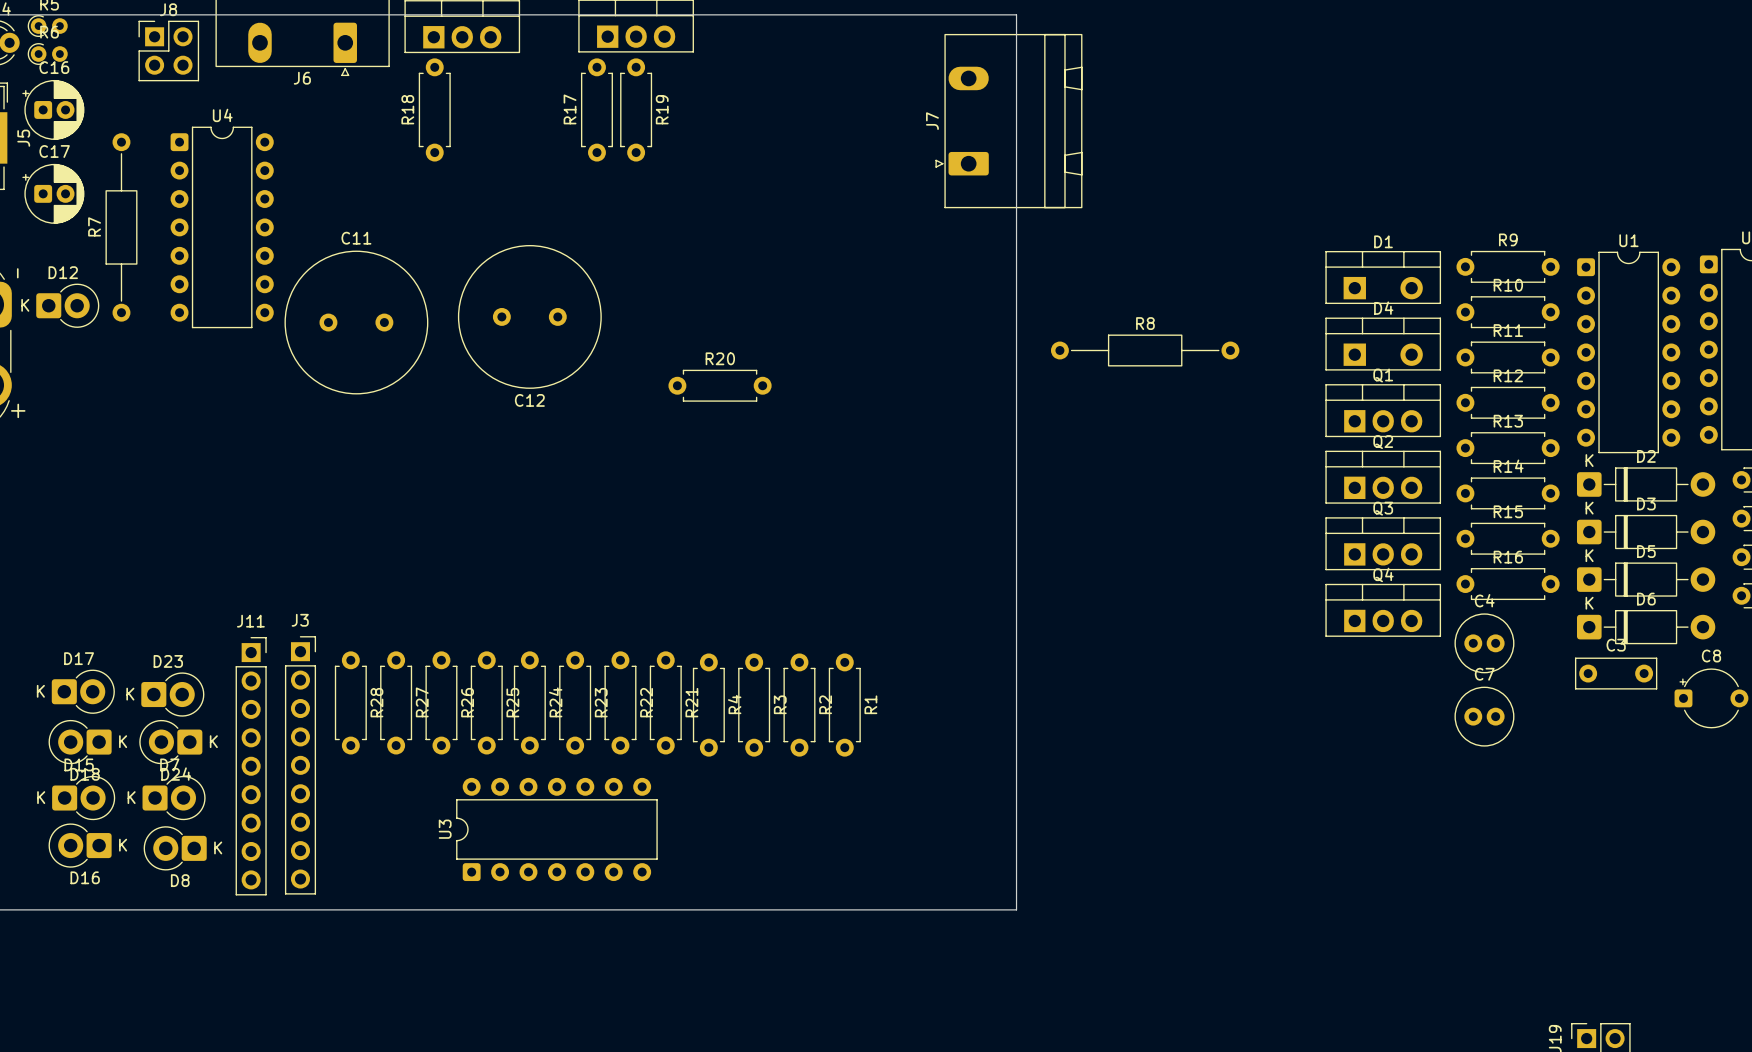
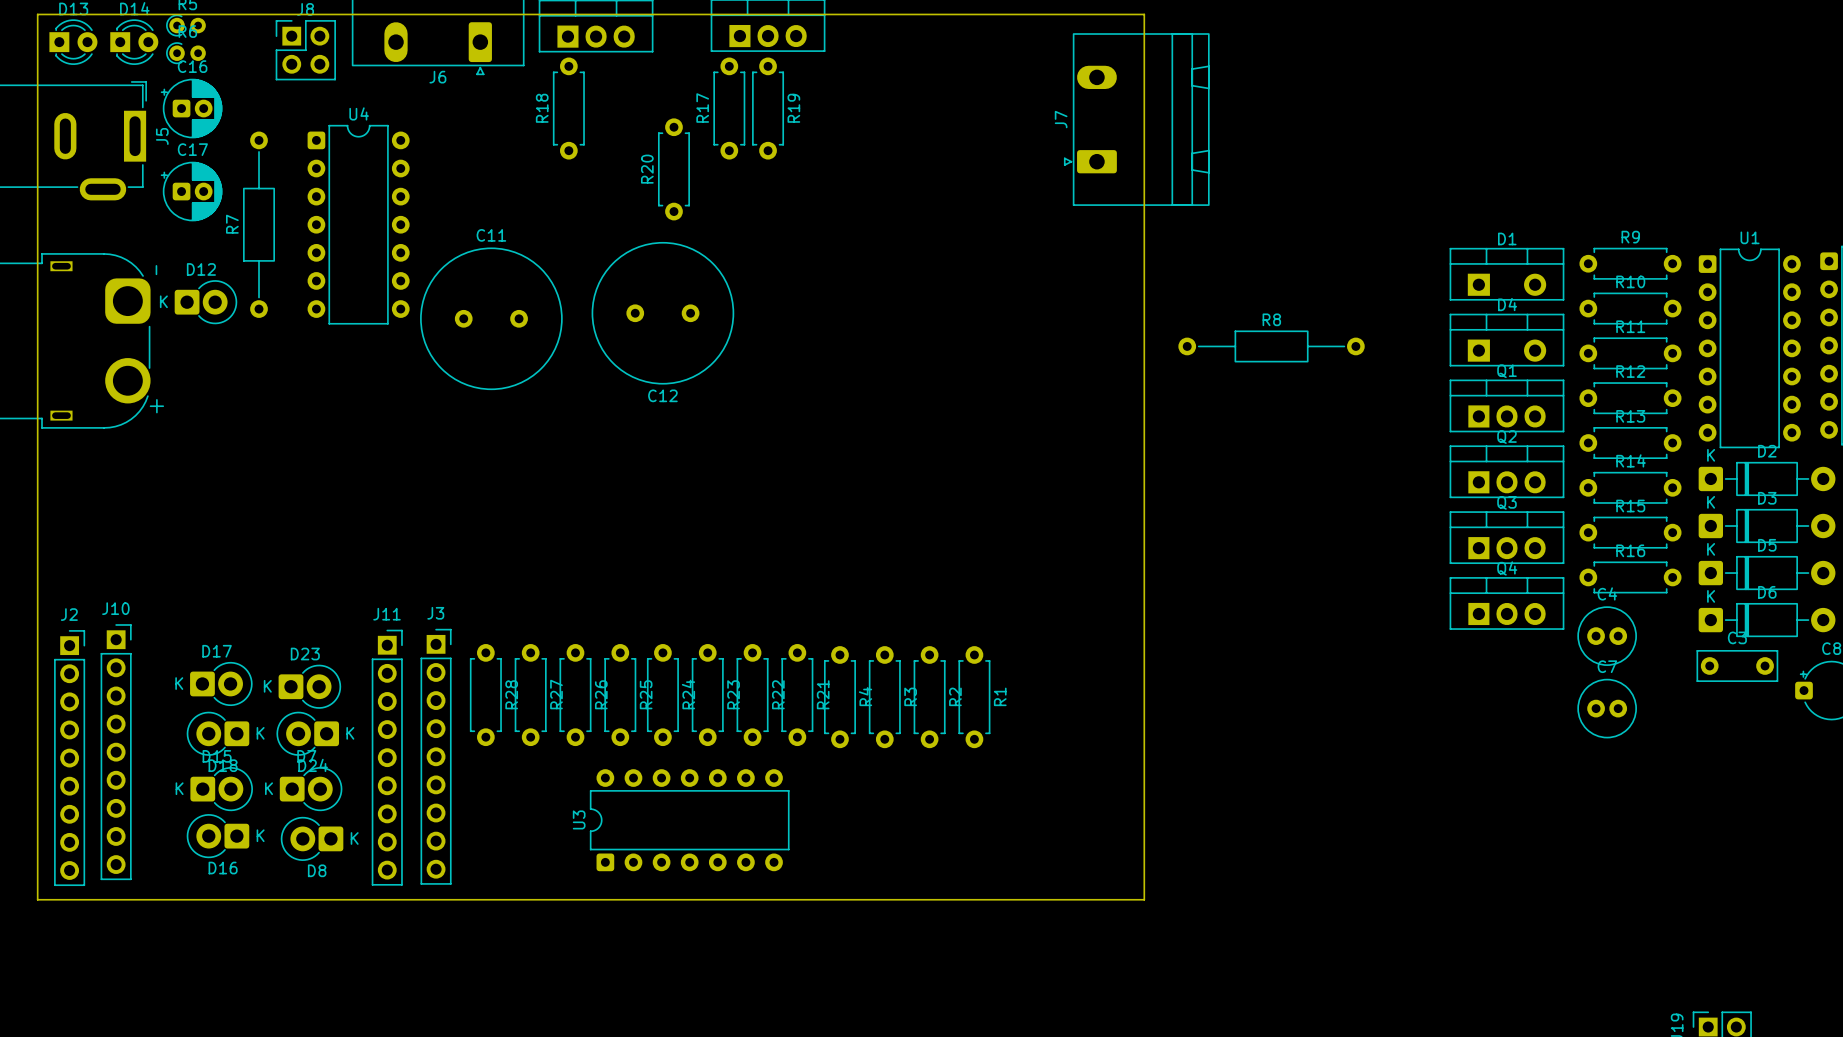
R20 name position: R20 (720, 358) -> R20 (647, 169)
R20 rotation: 0° (720, 385) -> 90° clockwise (673, 169)
R20 position: (720, 385) -> (673, 169)

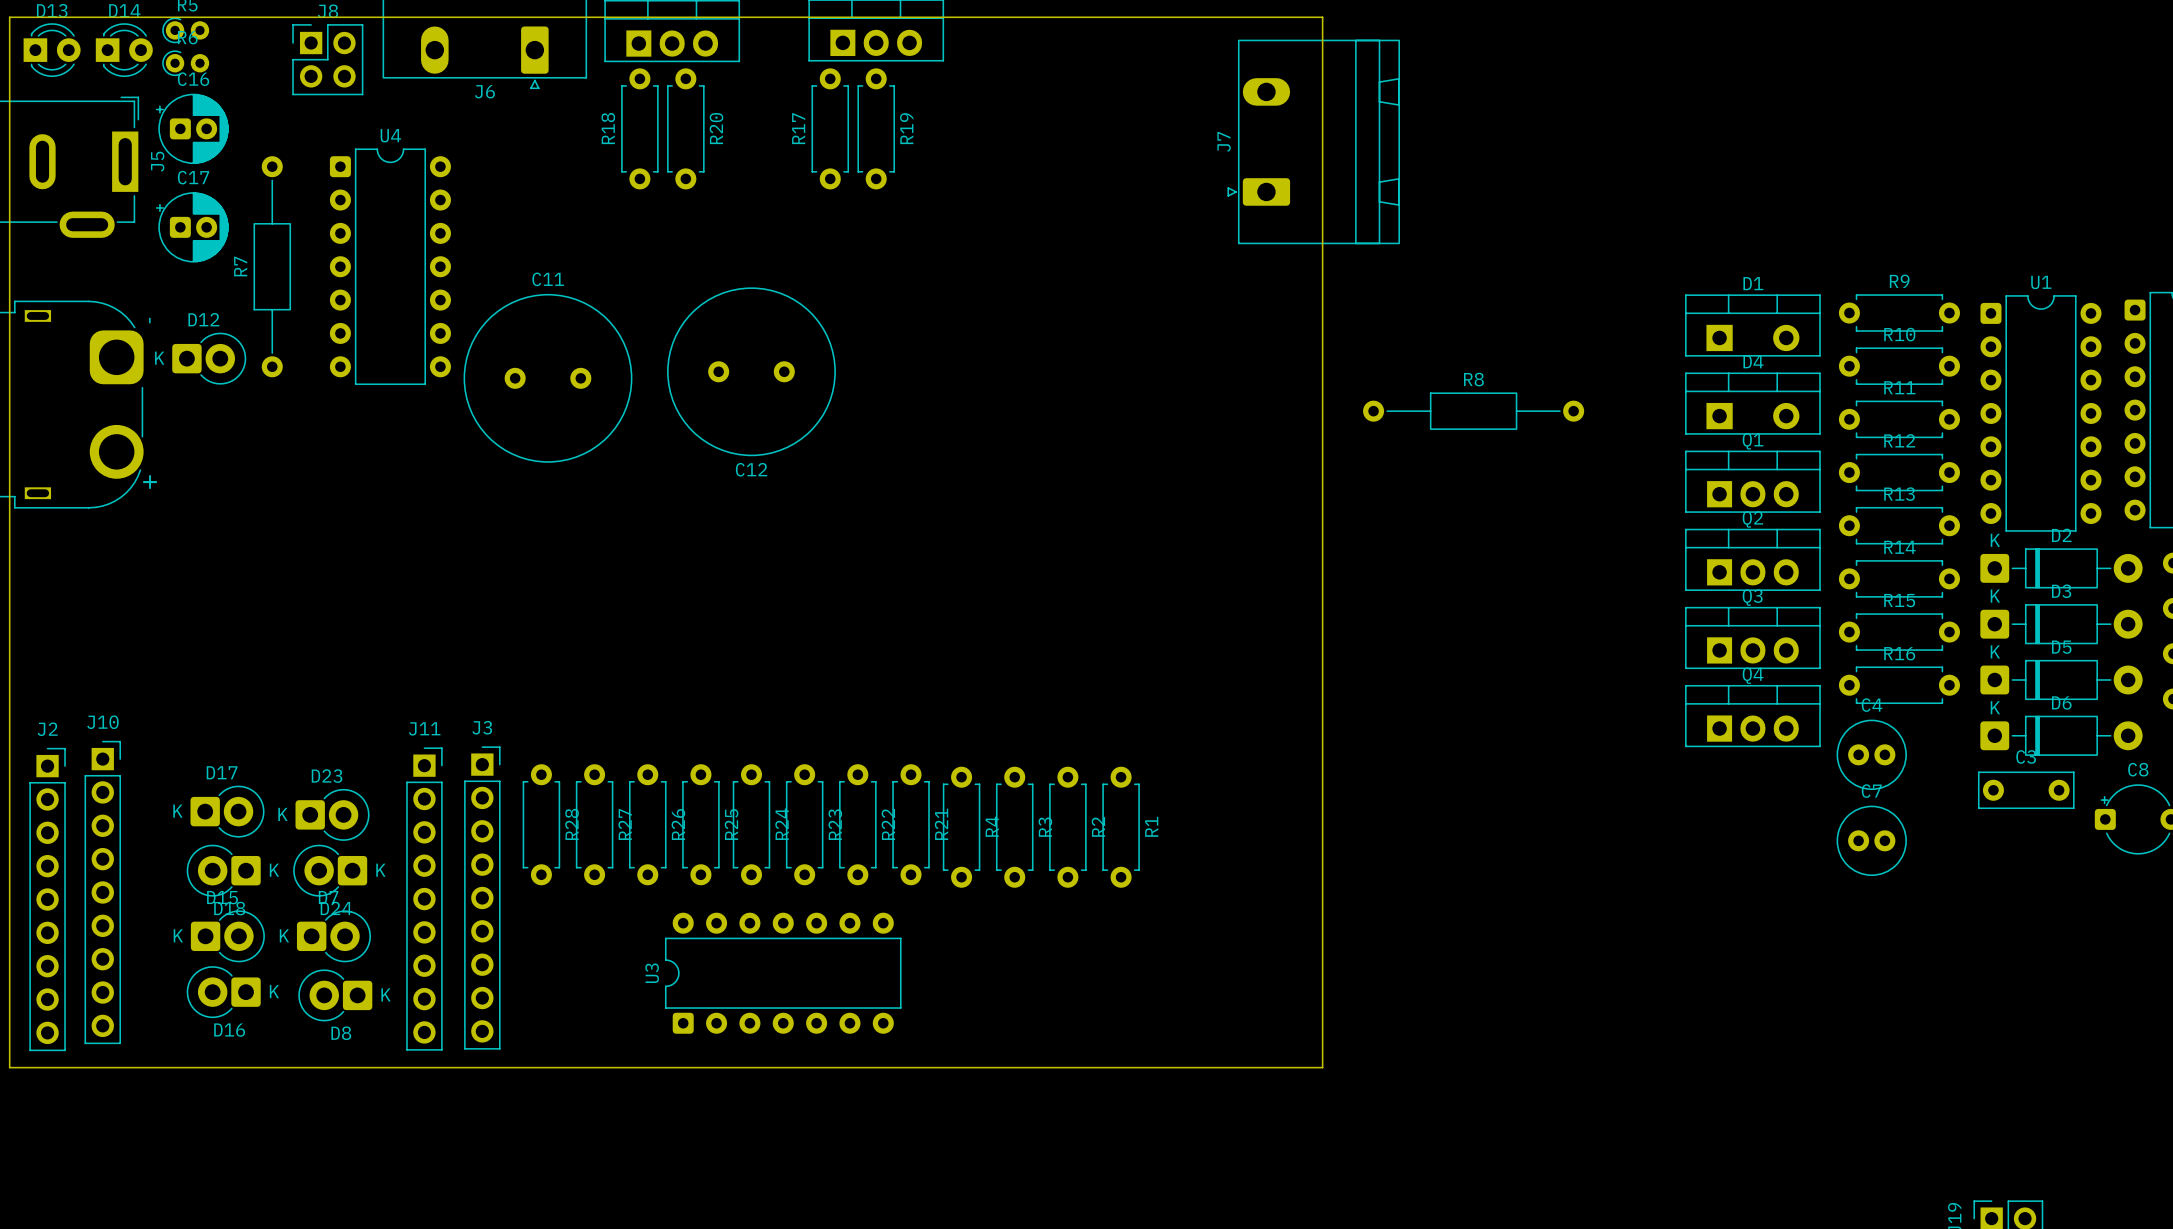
R20 name position: R20 (647, 169) -> R20 (716, 128)
R20 position: (673, 169) -> (685, 128)

